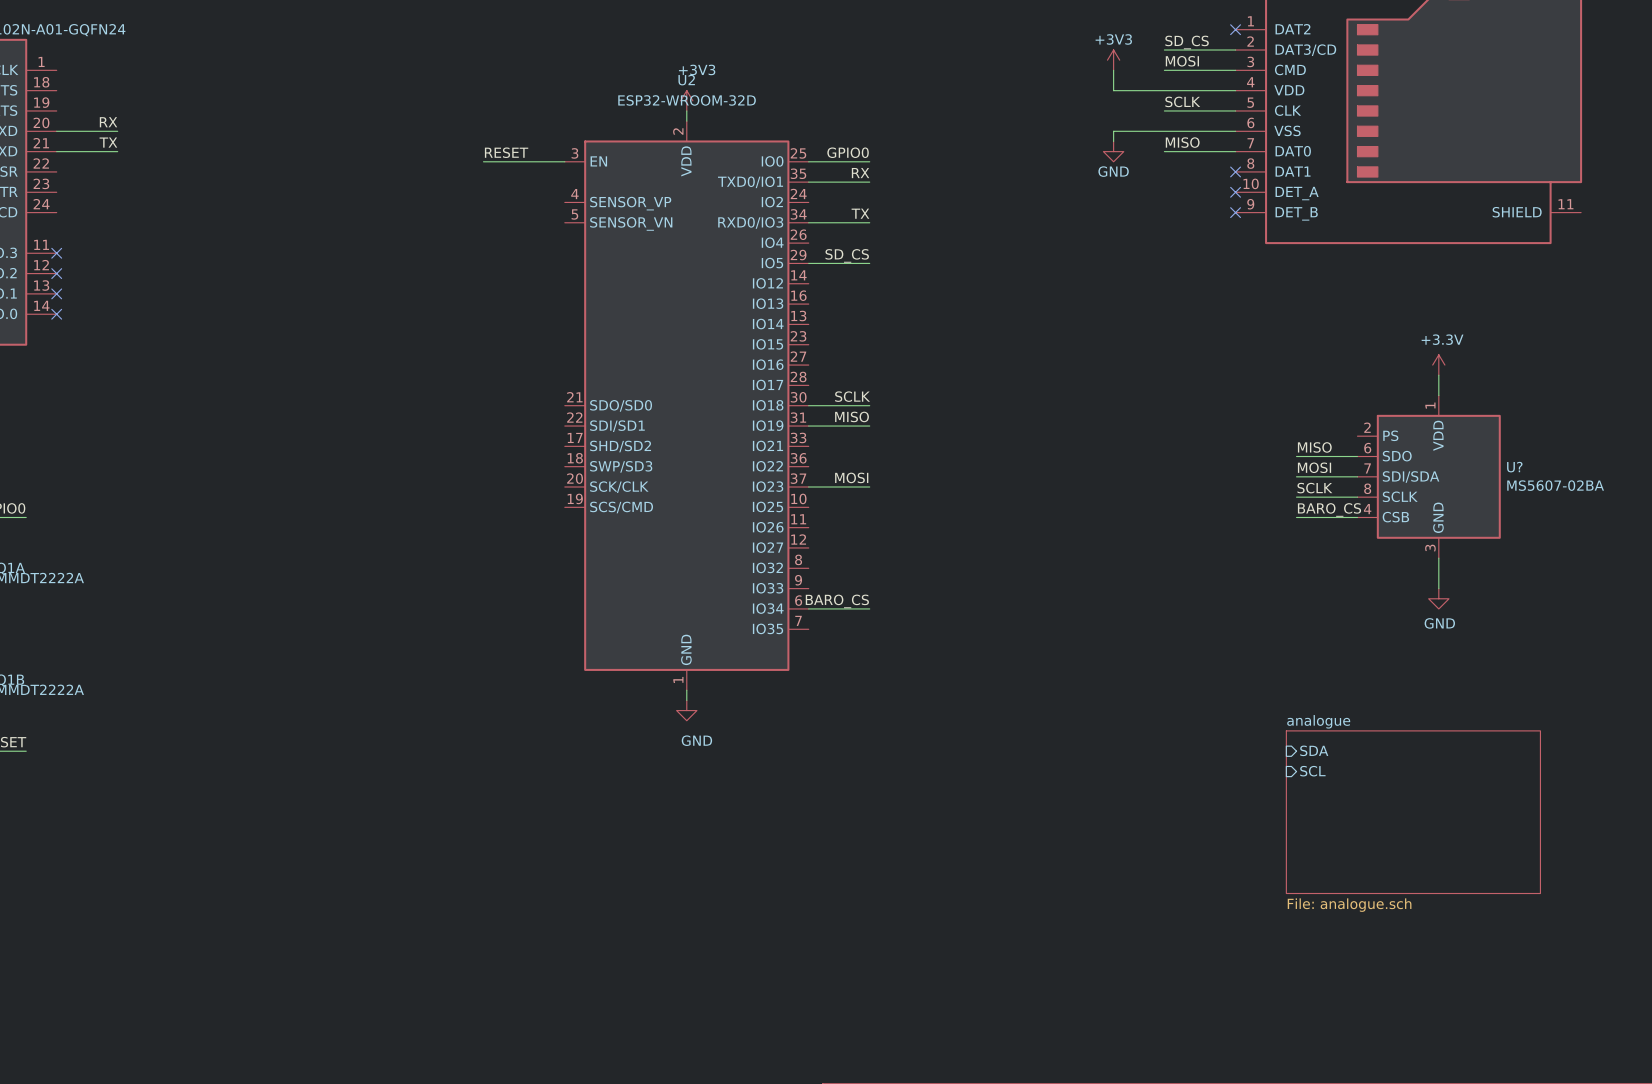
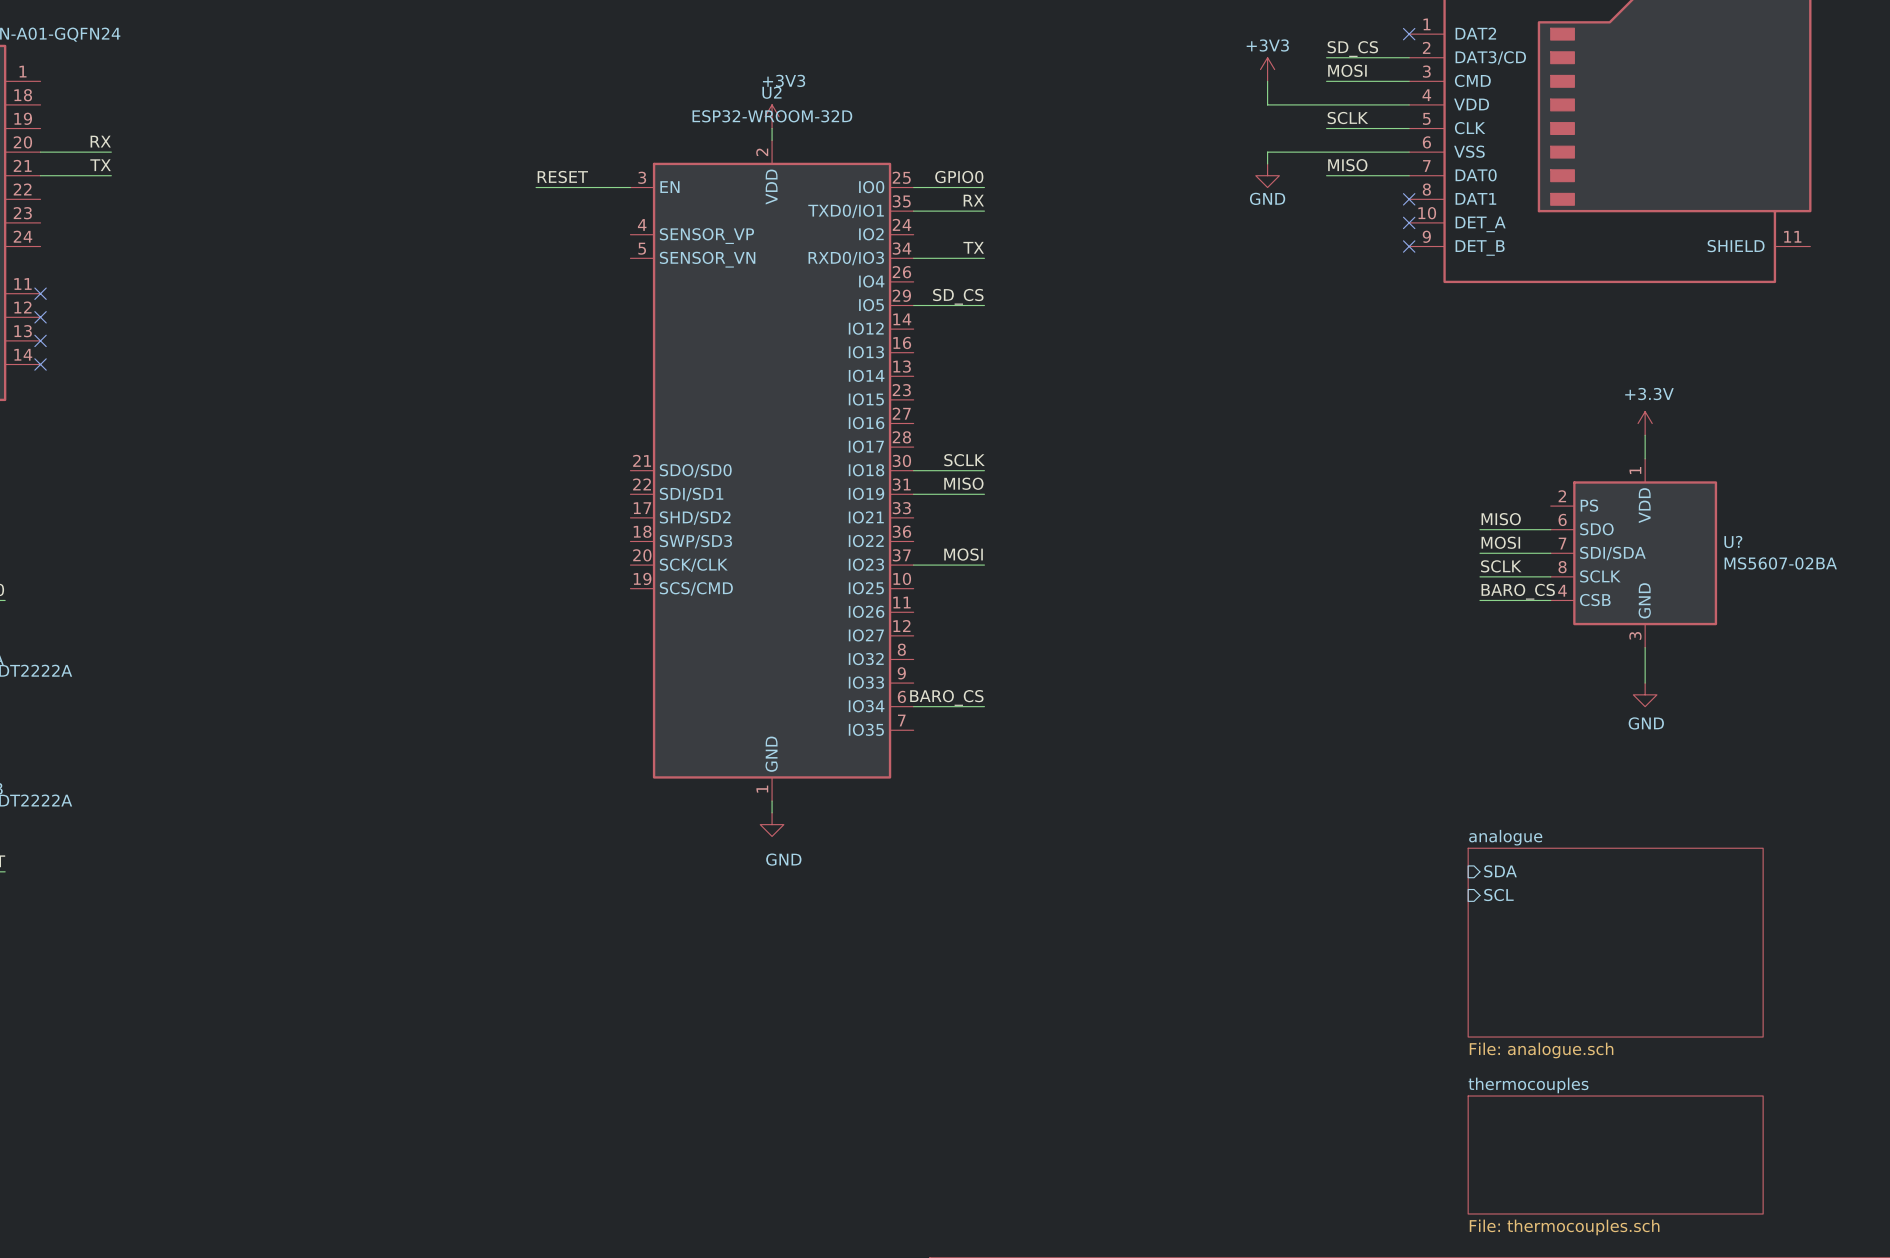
sheet thermocouples: none -> File: thermocouples.sch (1615, 1155)

